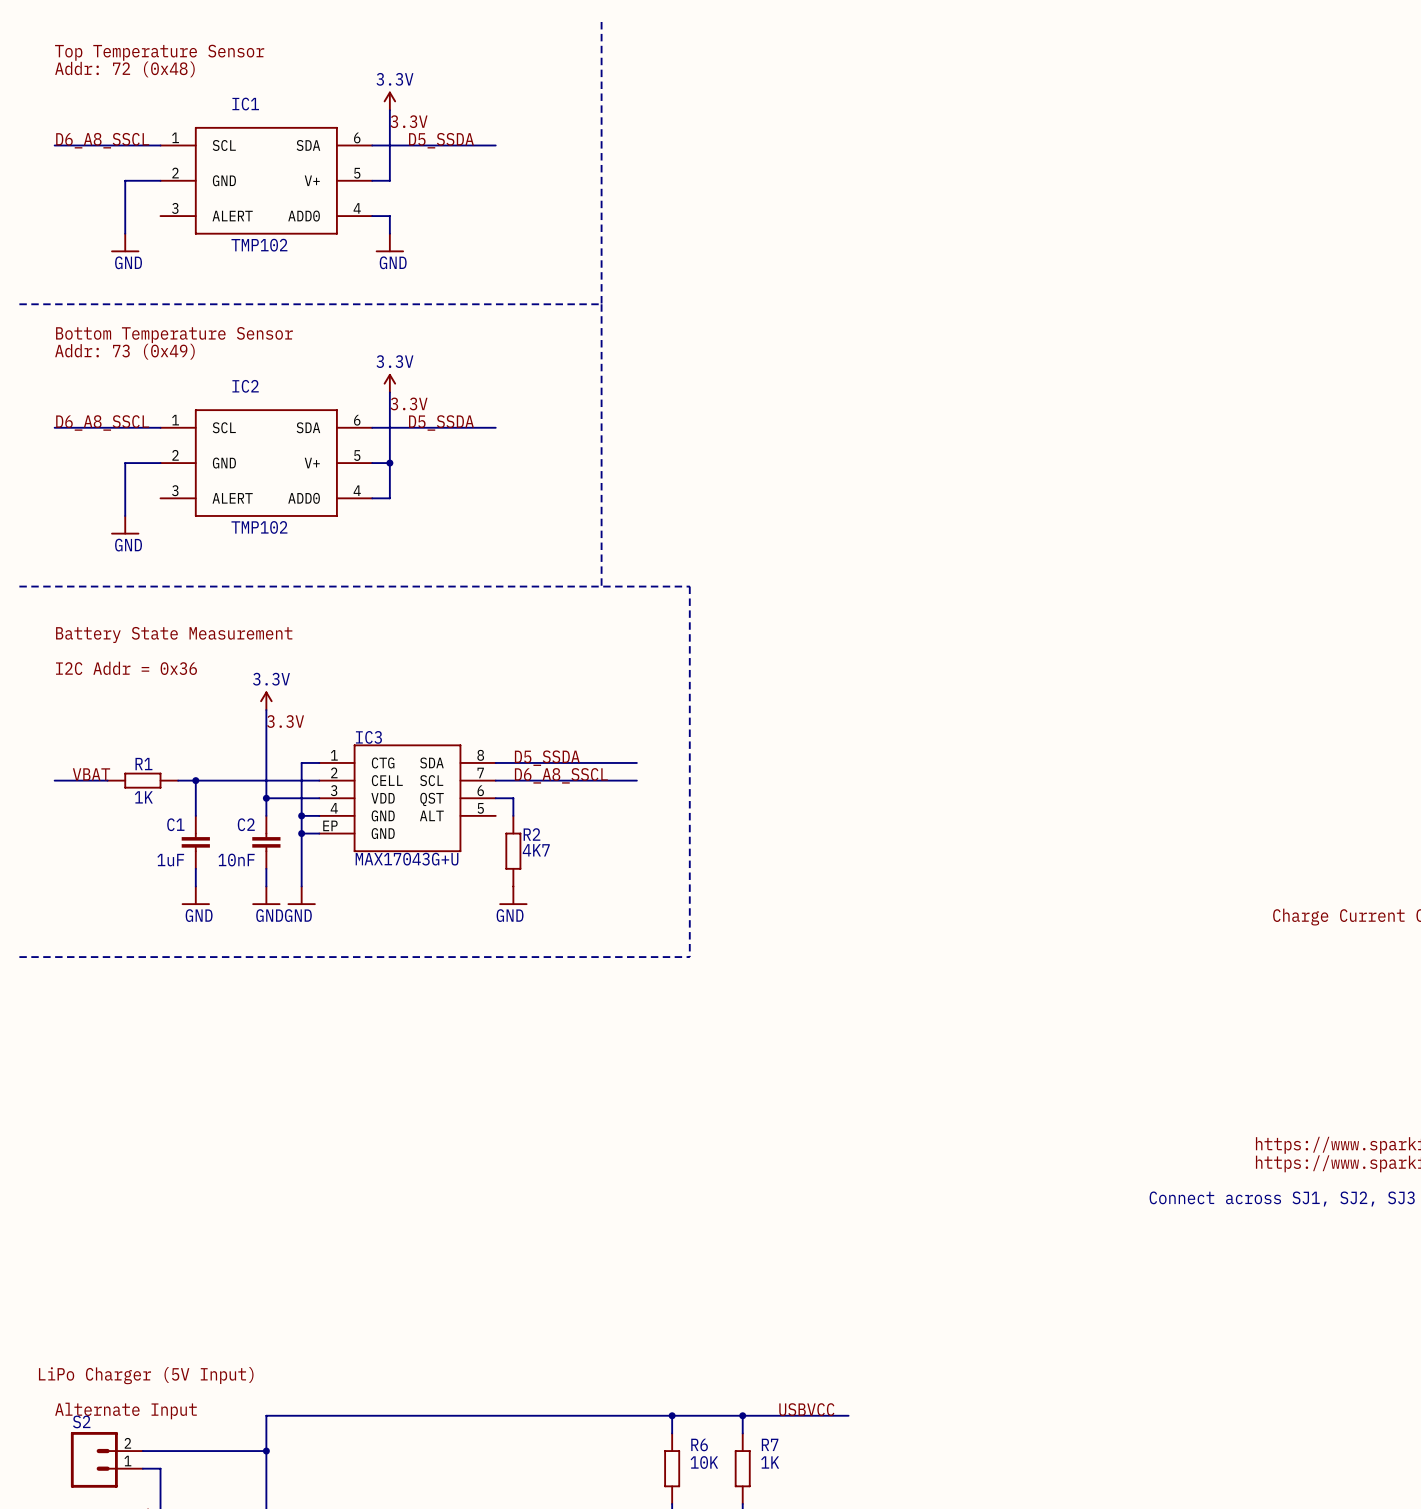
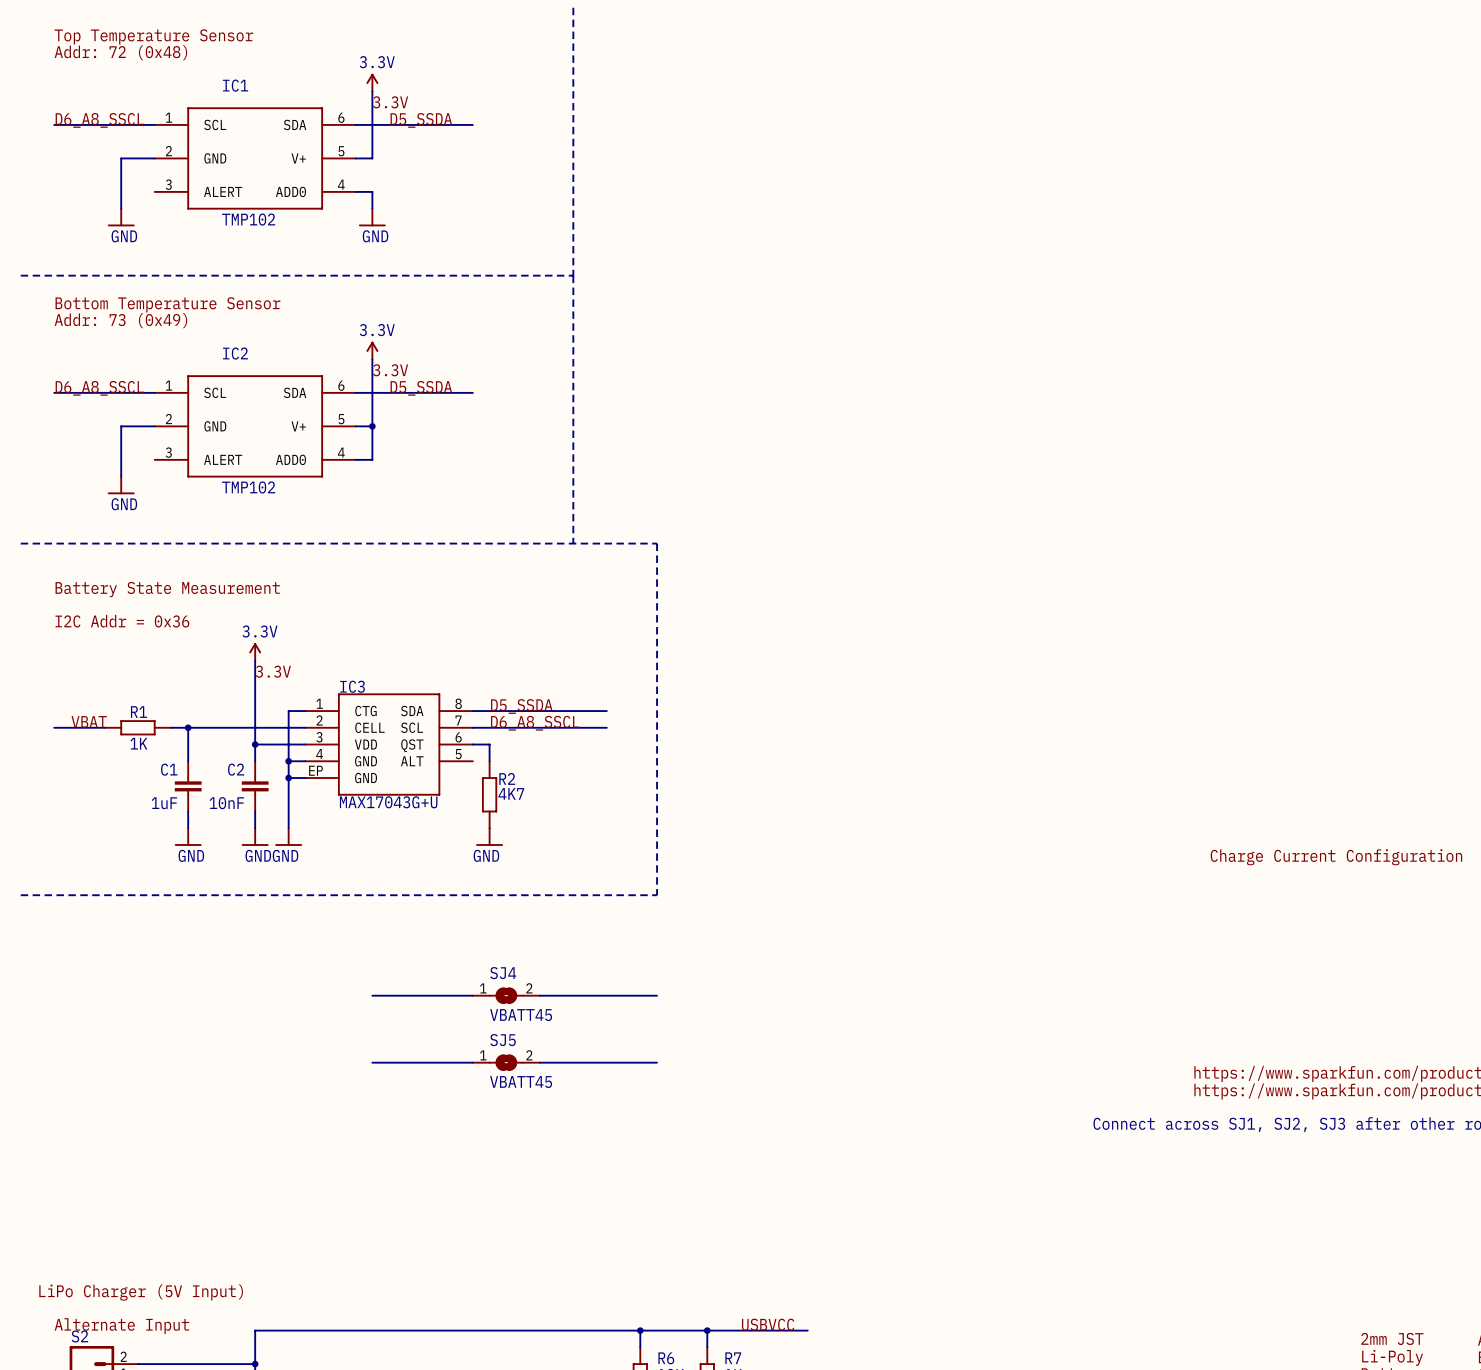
wire: none -> (372, 995) (472, 995)
SJ4: none -> VBATT45 (506, 995)
wire: none -> (539, 995) (657, 995)
wire: none -> (372, 1062) (472, 1062)
SJ5: none -> VBATT45 (506, 1062)
wire: none -> (539, 1062) (657, 1062)

